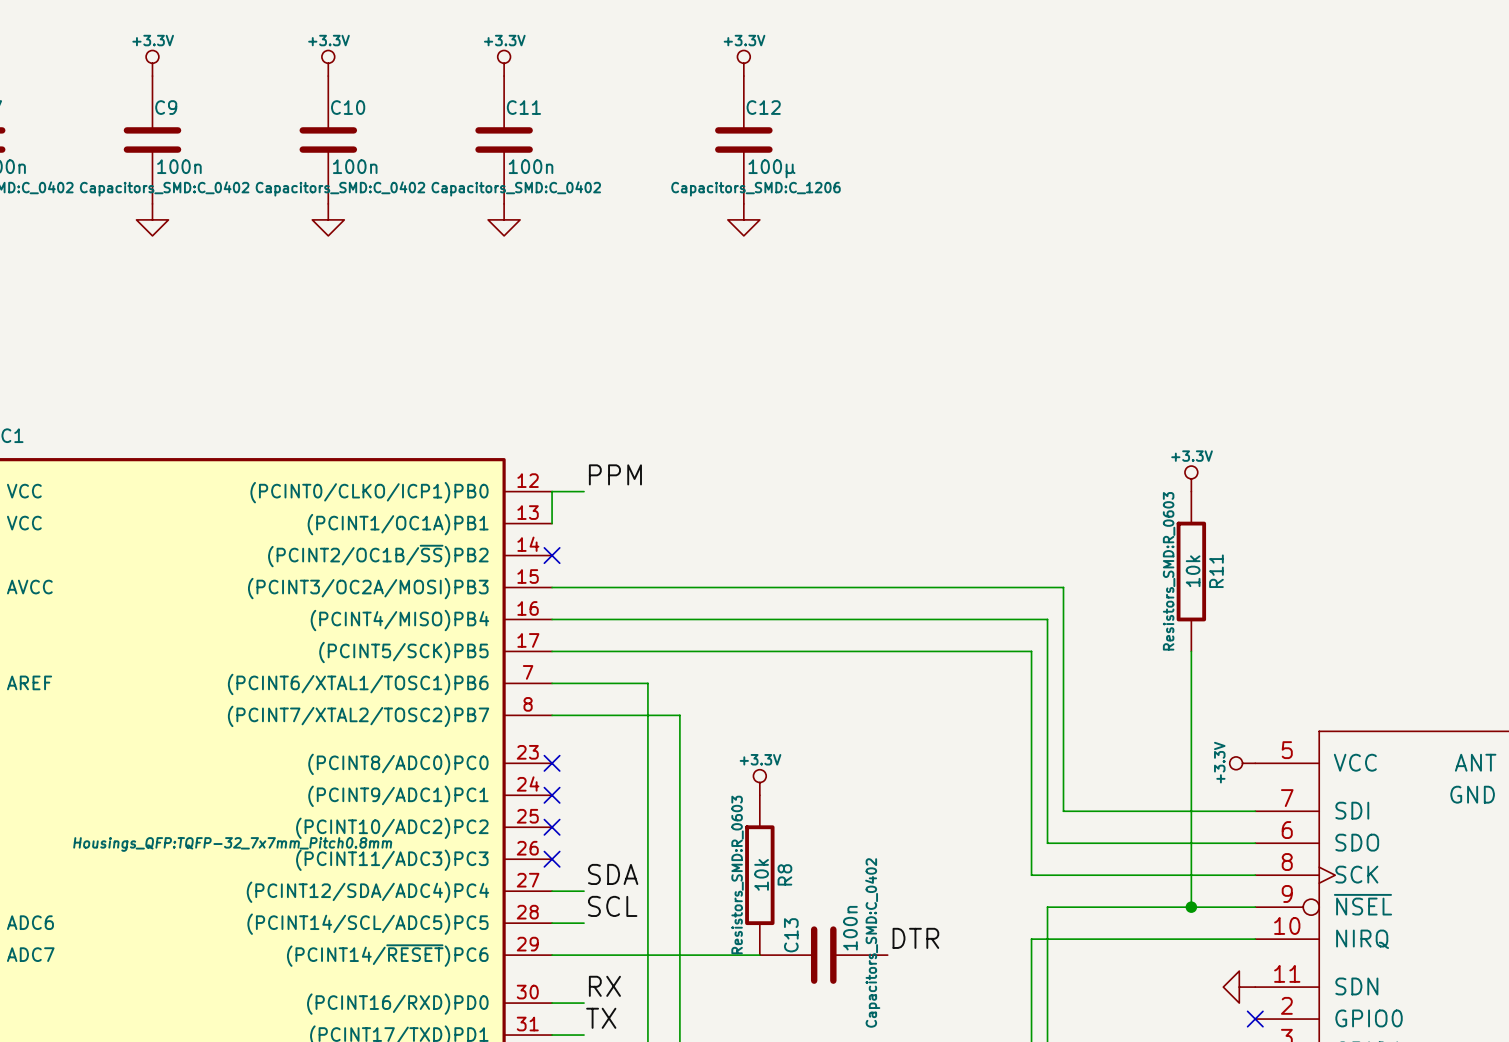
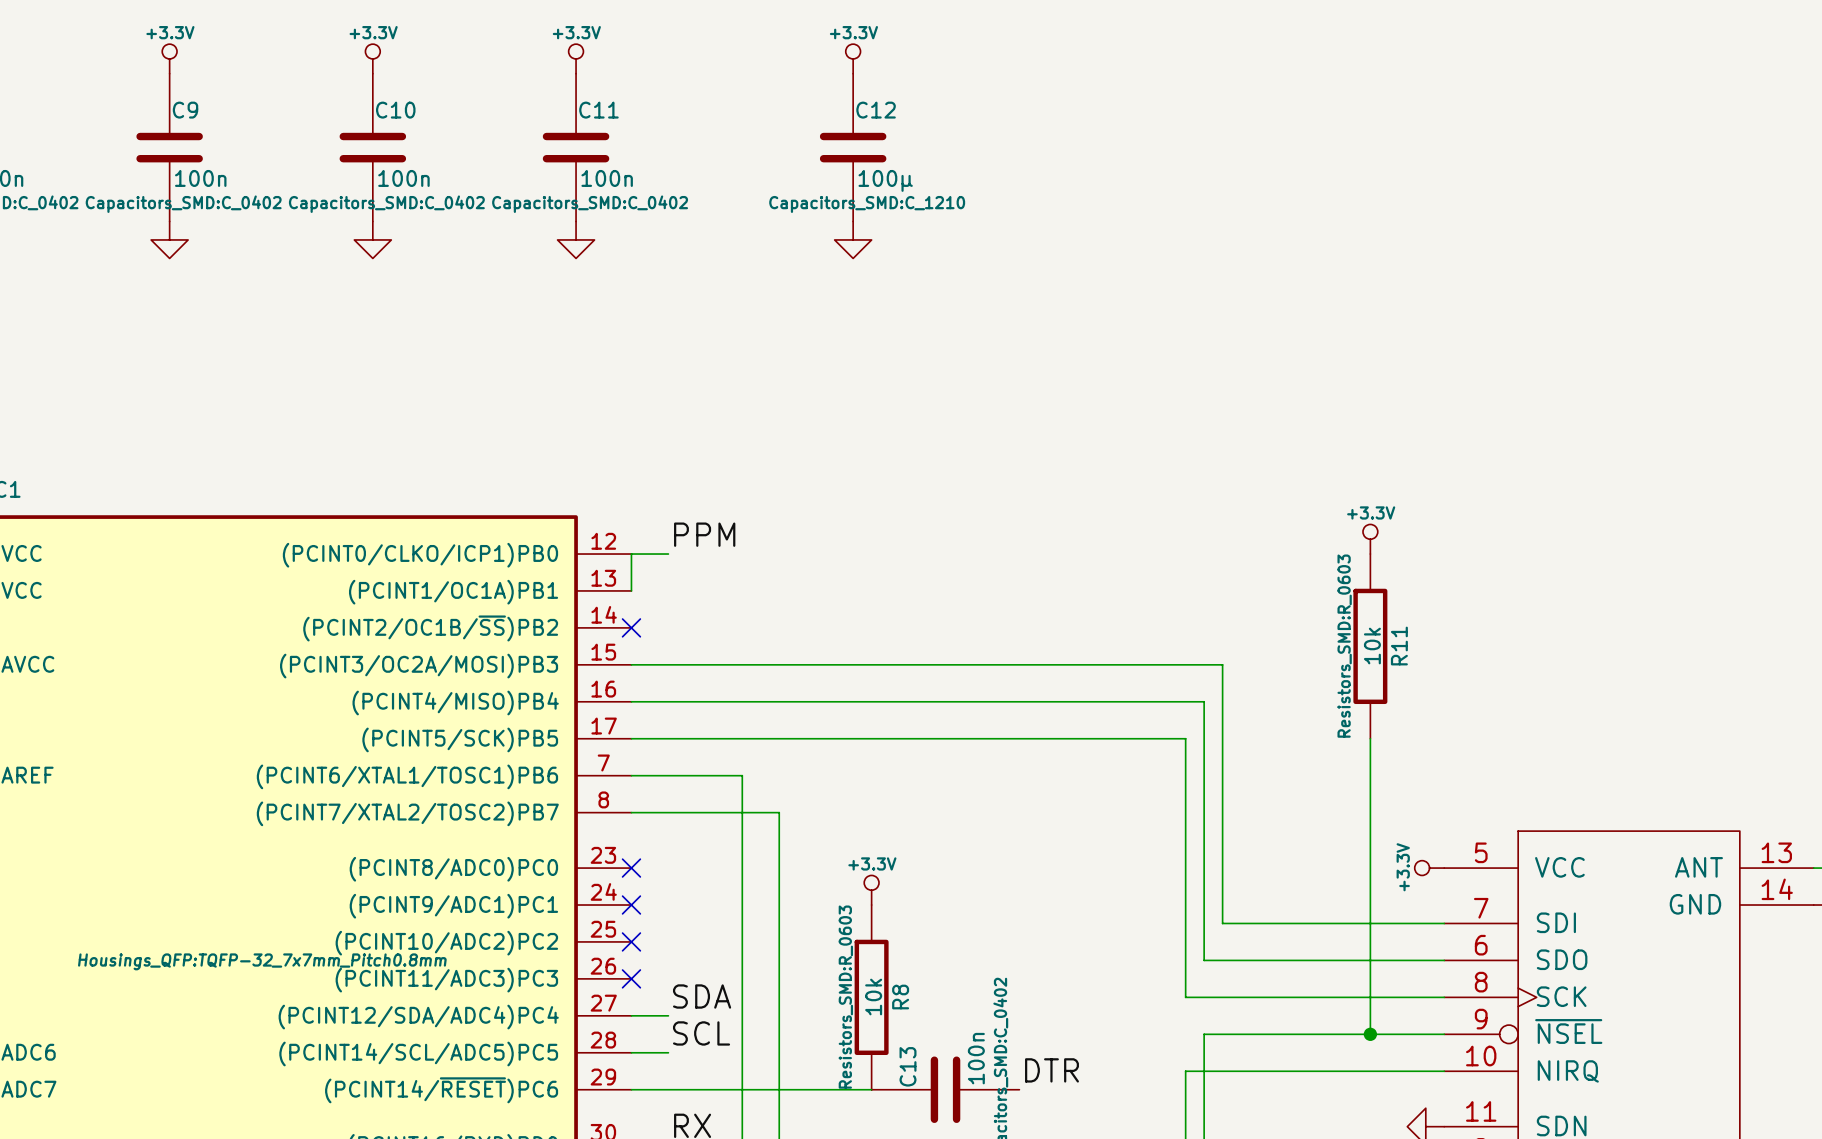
C12 text: Capacitors_SMD:C_1206 (755, 189) -> Capacitors_SMD:C_1210 (867, 204)

